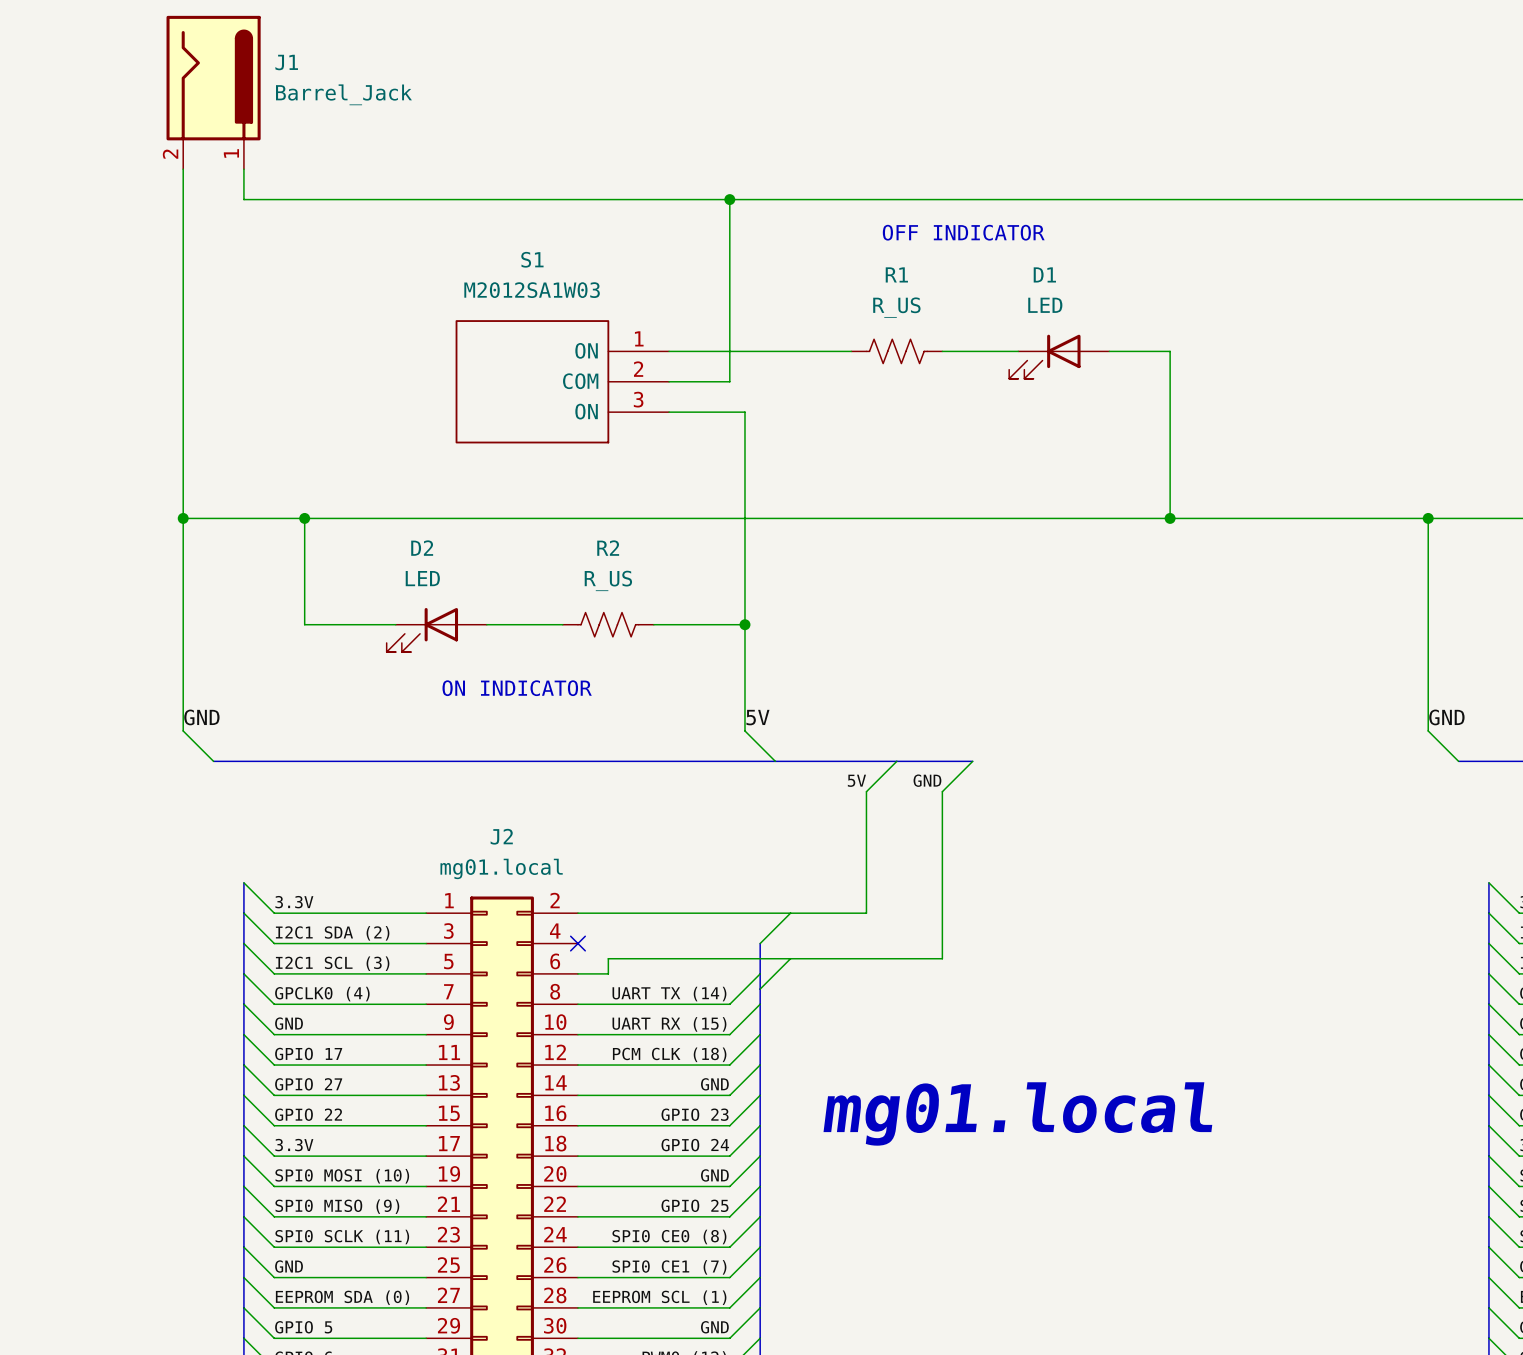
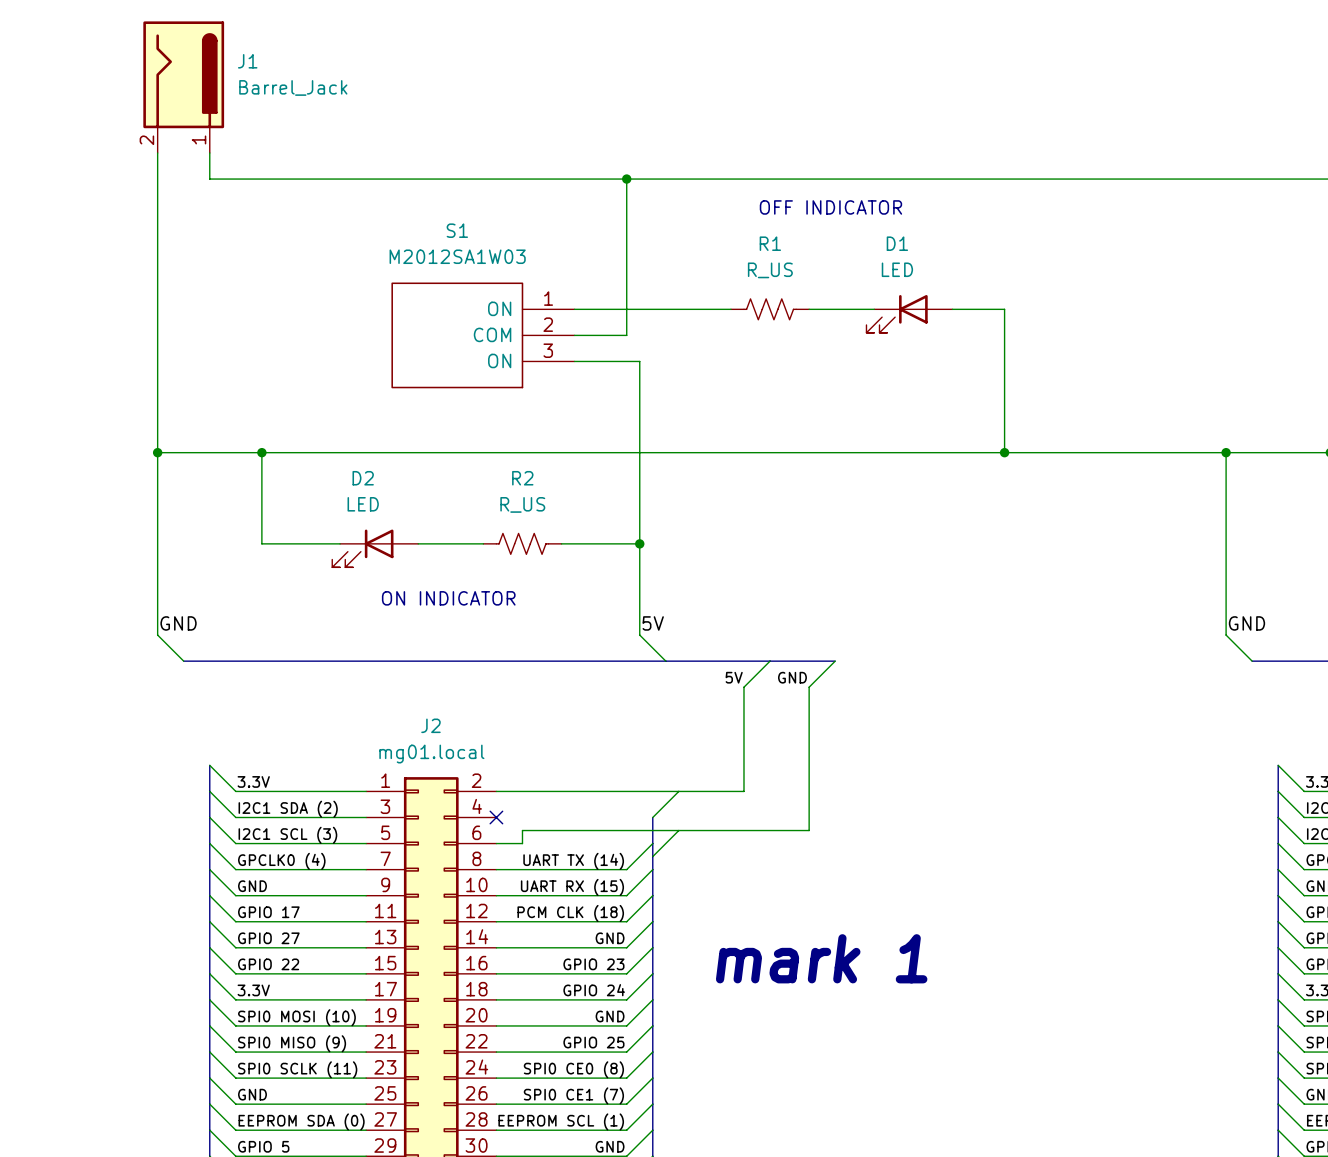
text: mg01.local (1017, 1113) -> mark 1 (821, 958)

